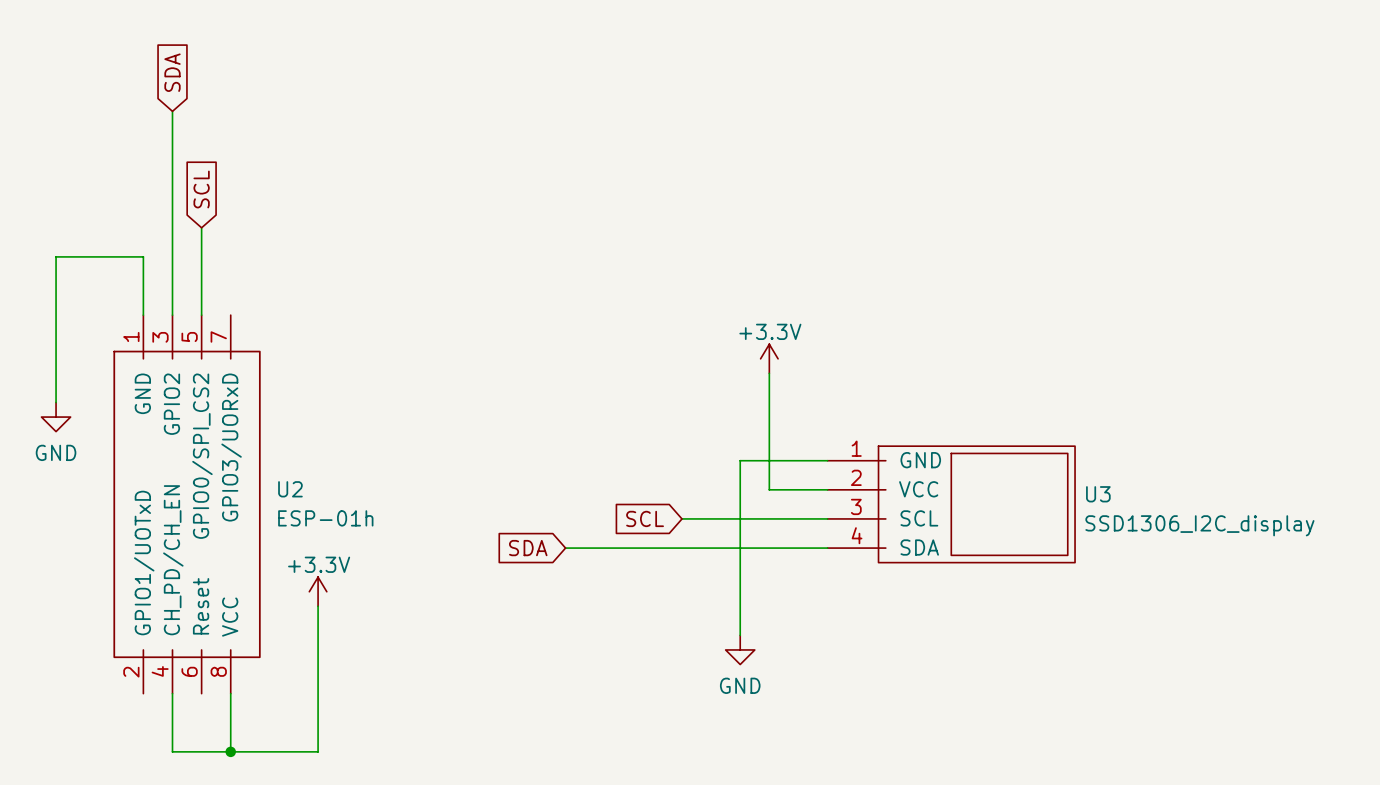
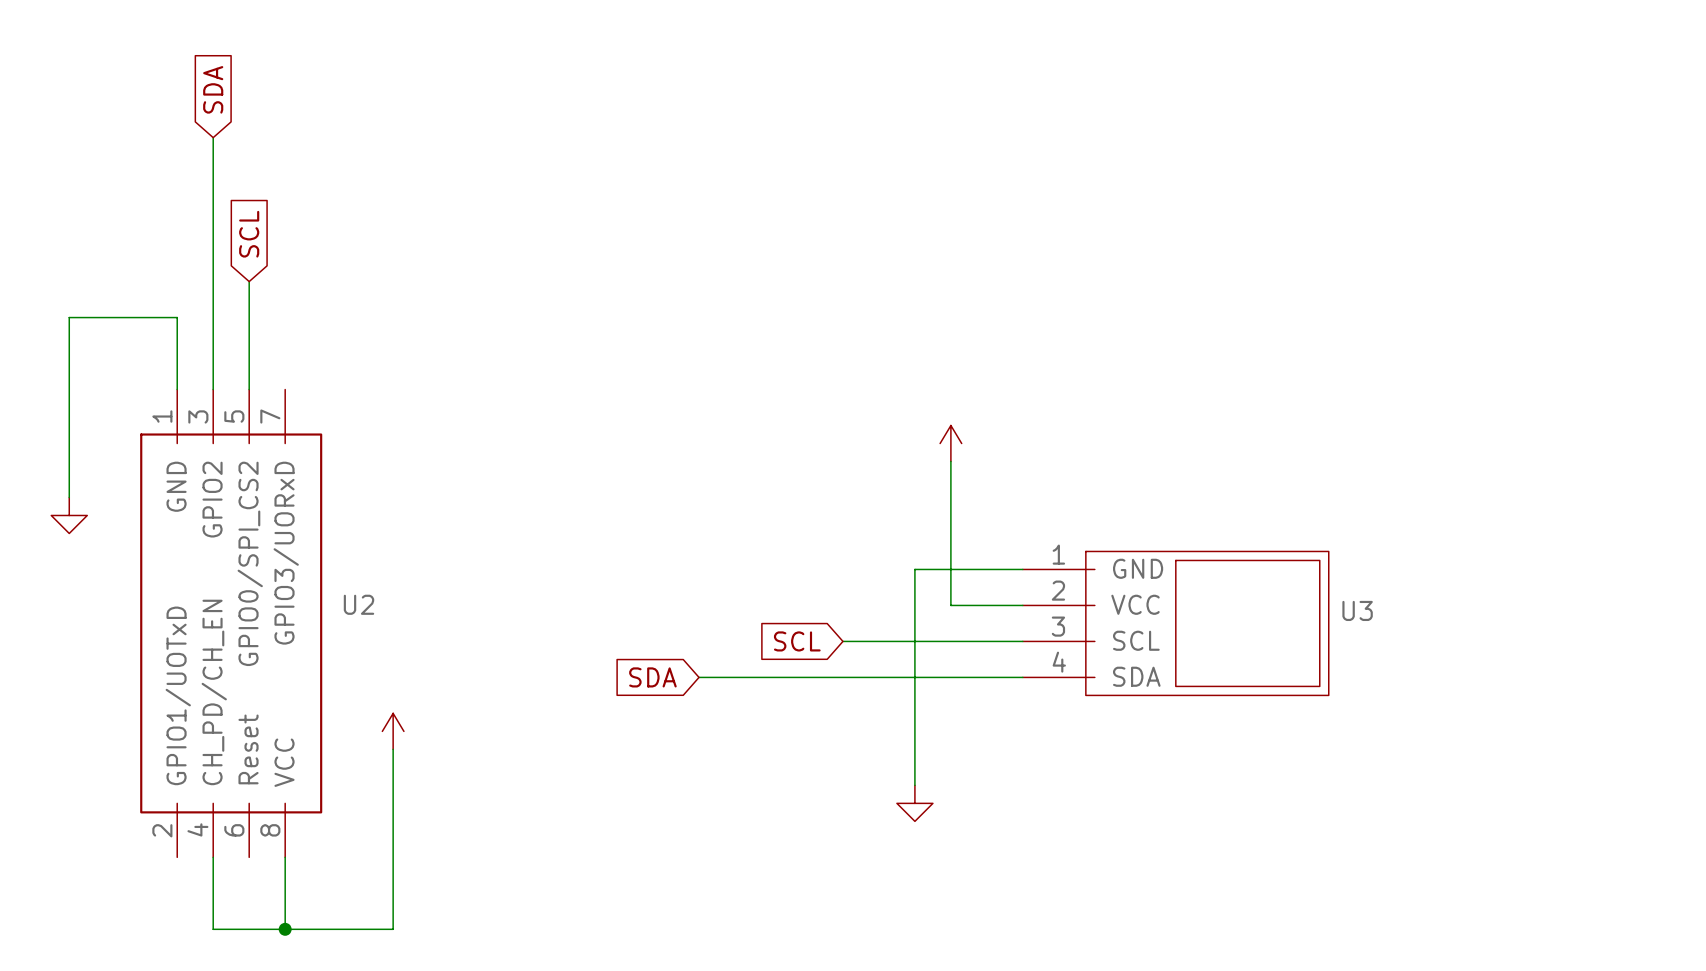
power symbol text: +3.3V (770, 331) -> none
power symbol text: GND (56, 452) -> none
U2 value: ESP-01h (325, 518) -> none
U3 value: SSD1306_I2C_display (1199, 525) -> none
power symbol text: +3.3V (319, 564) -> none
power symbol text: GND (740, 685) -> none

